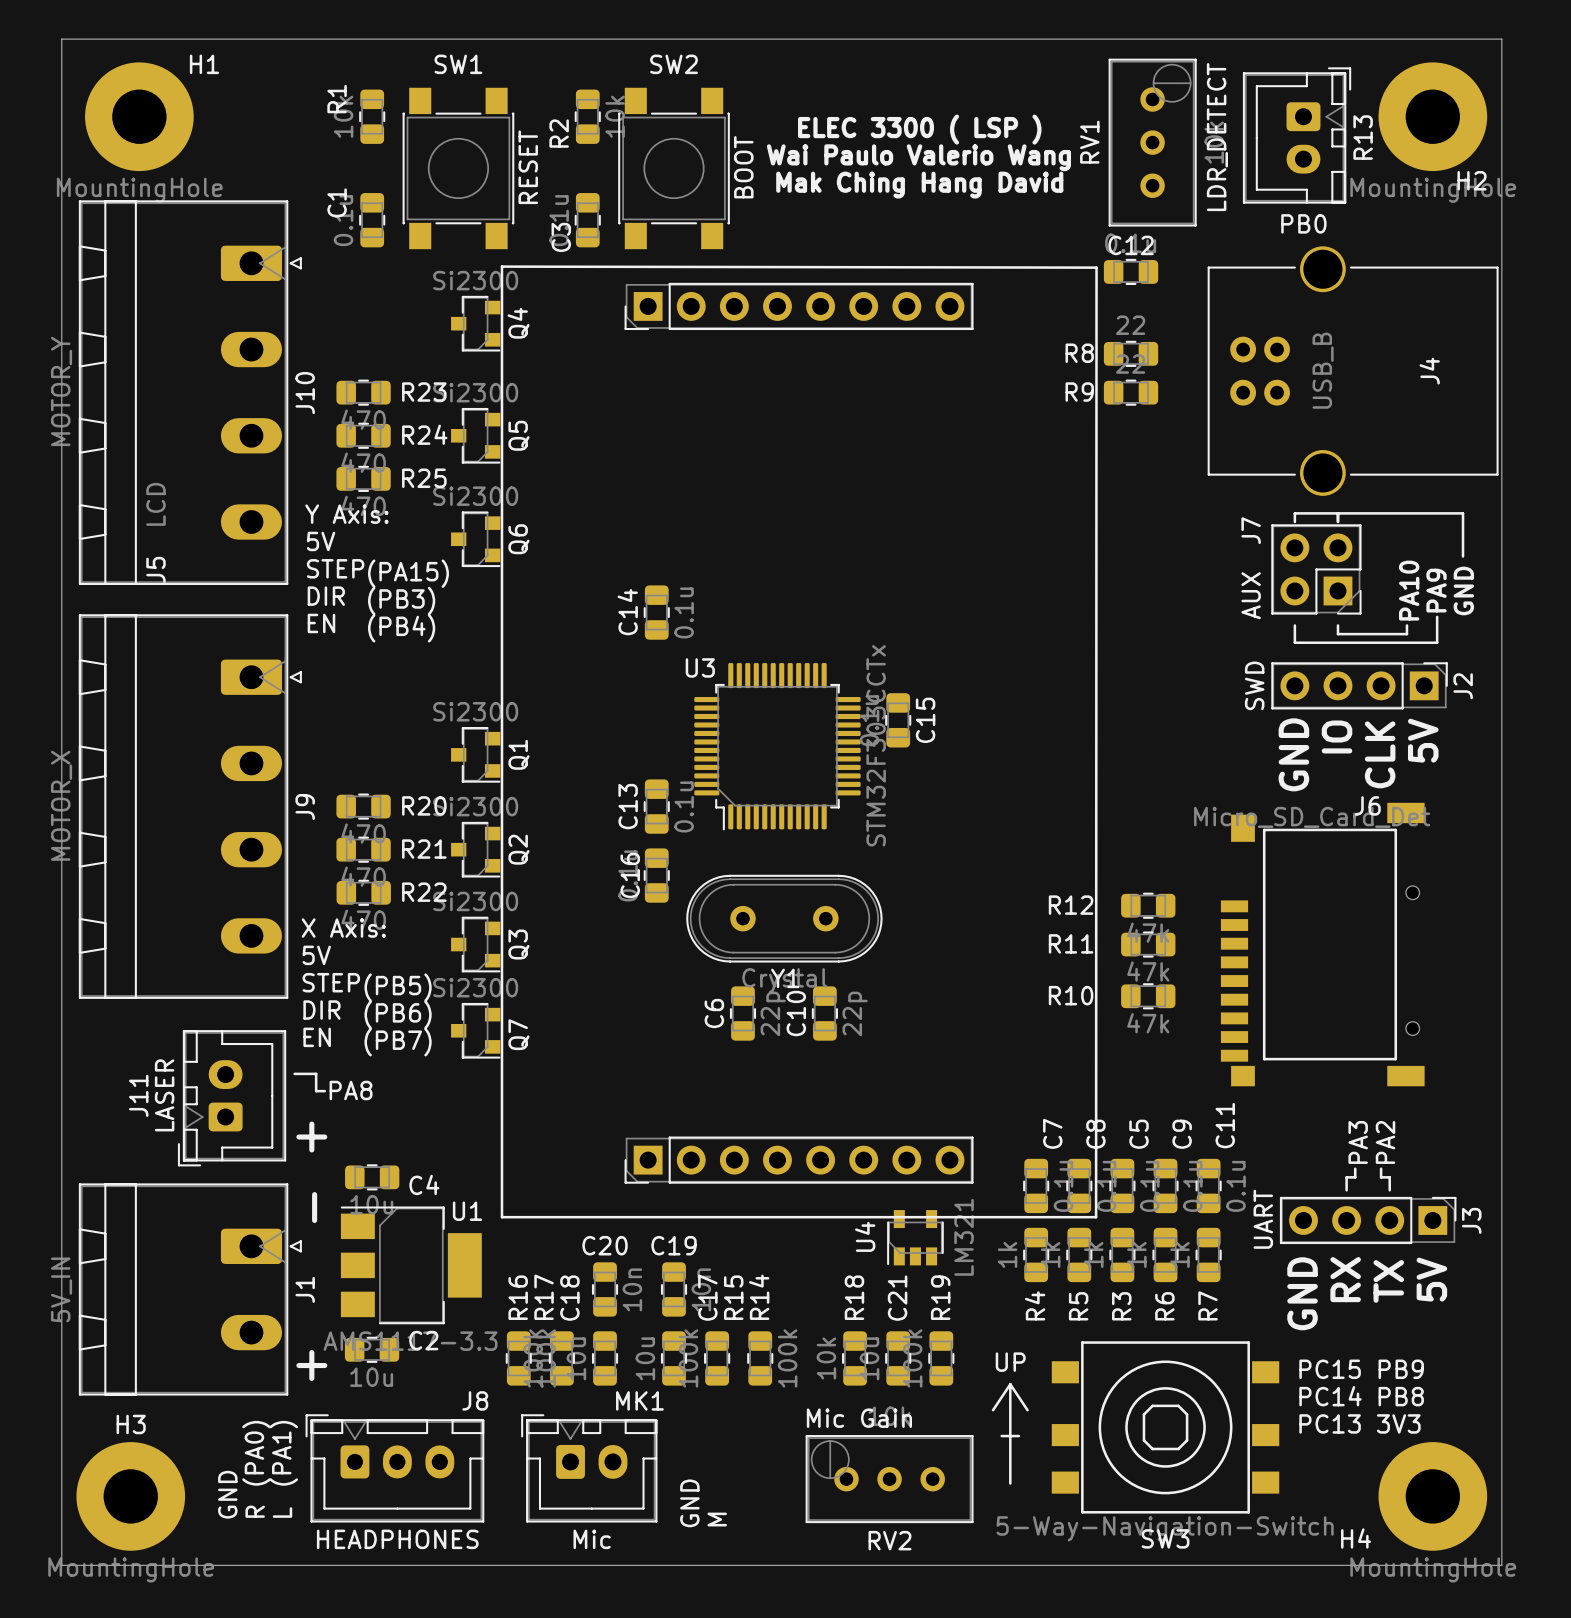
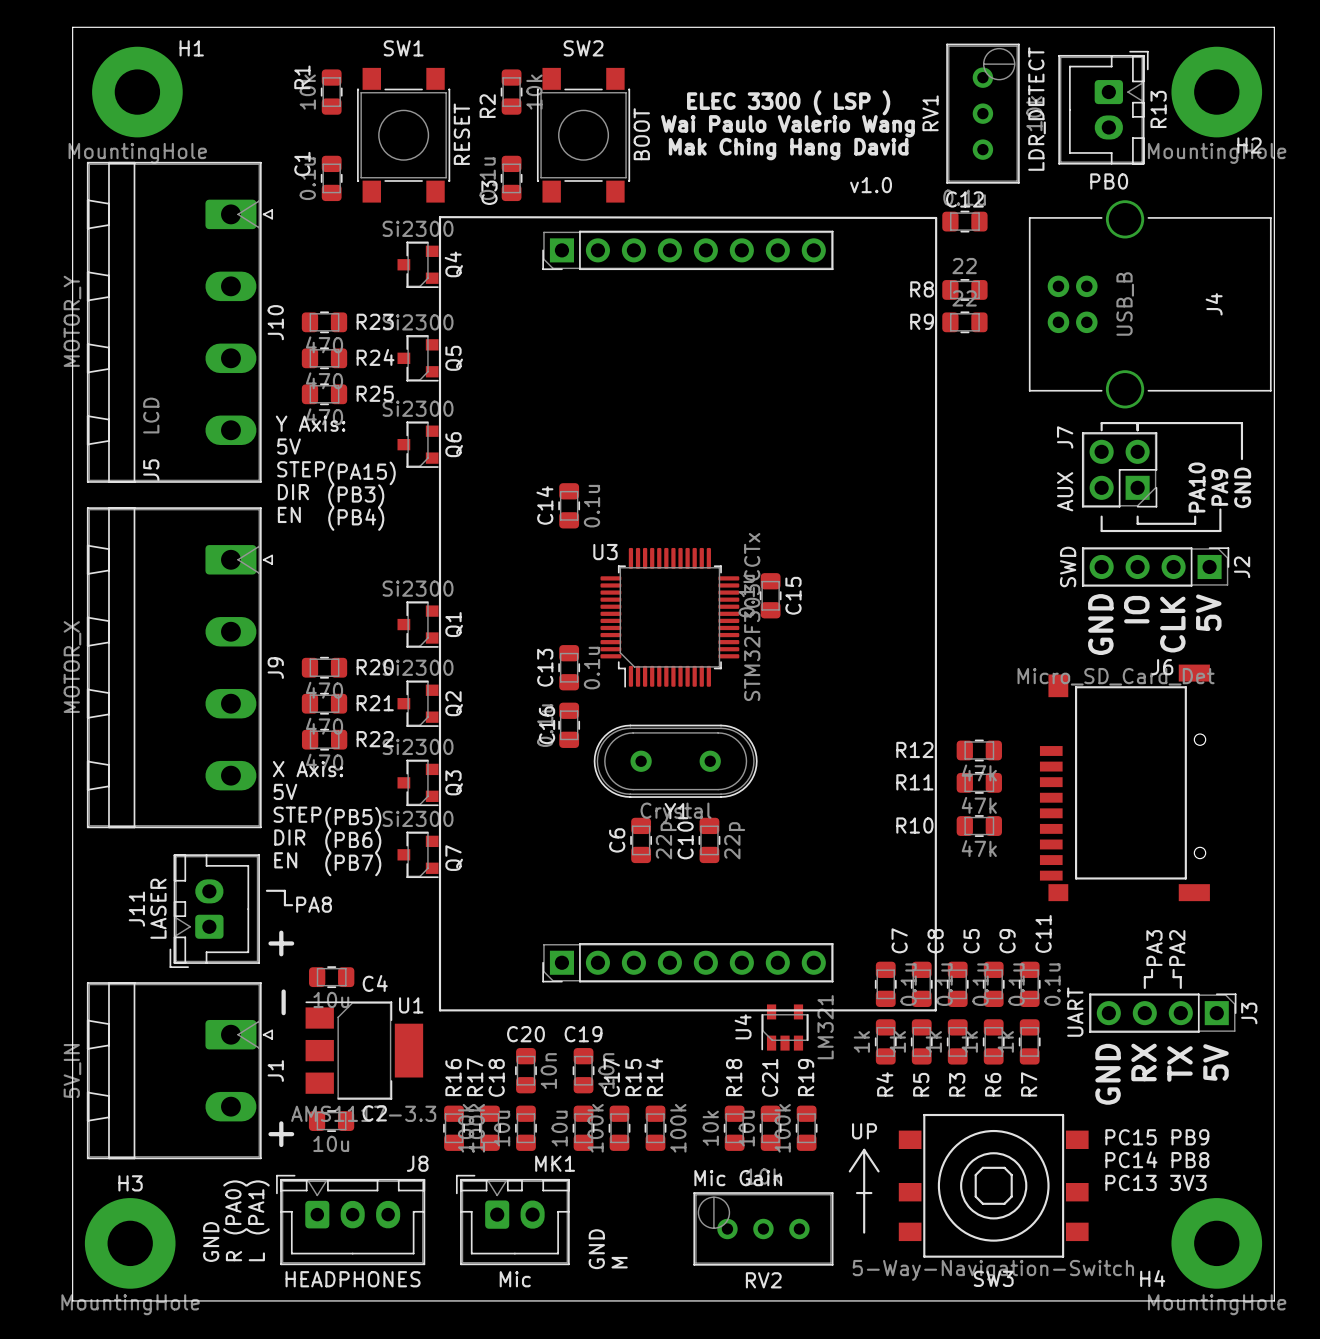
text: none -> v1.0 (871, 185)

